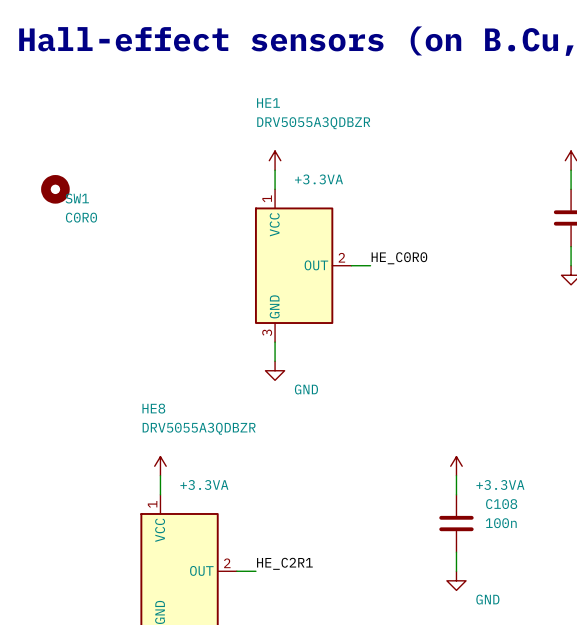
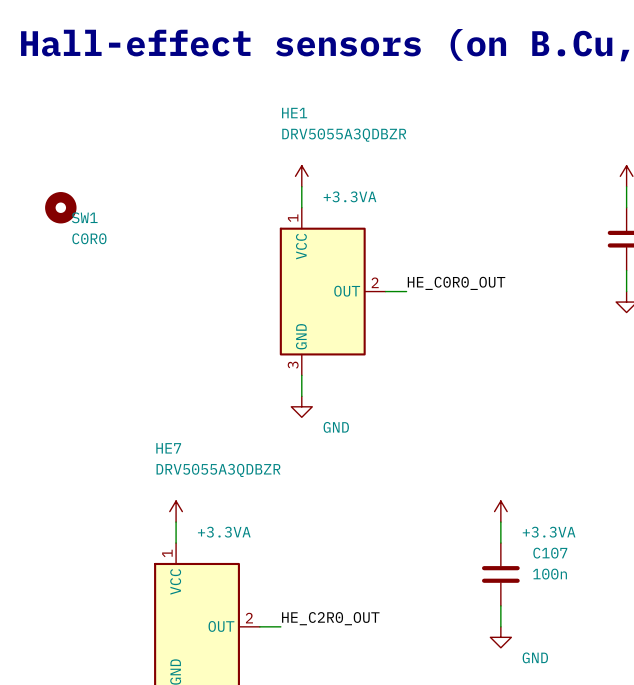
label: HE_C0R0 (399, 258) -> HE_C0R0_OUT (456, 283)
HE8 name: HE8 (153, 408) -> HE7 (168, 448)
C108 name: C108 (501, 504) -> C107 (550, 553)
label: HE_C2R1 (284, 563) -> HE_C2R0_OUT (330, 618)

